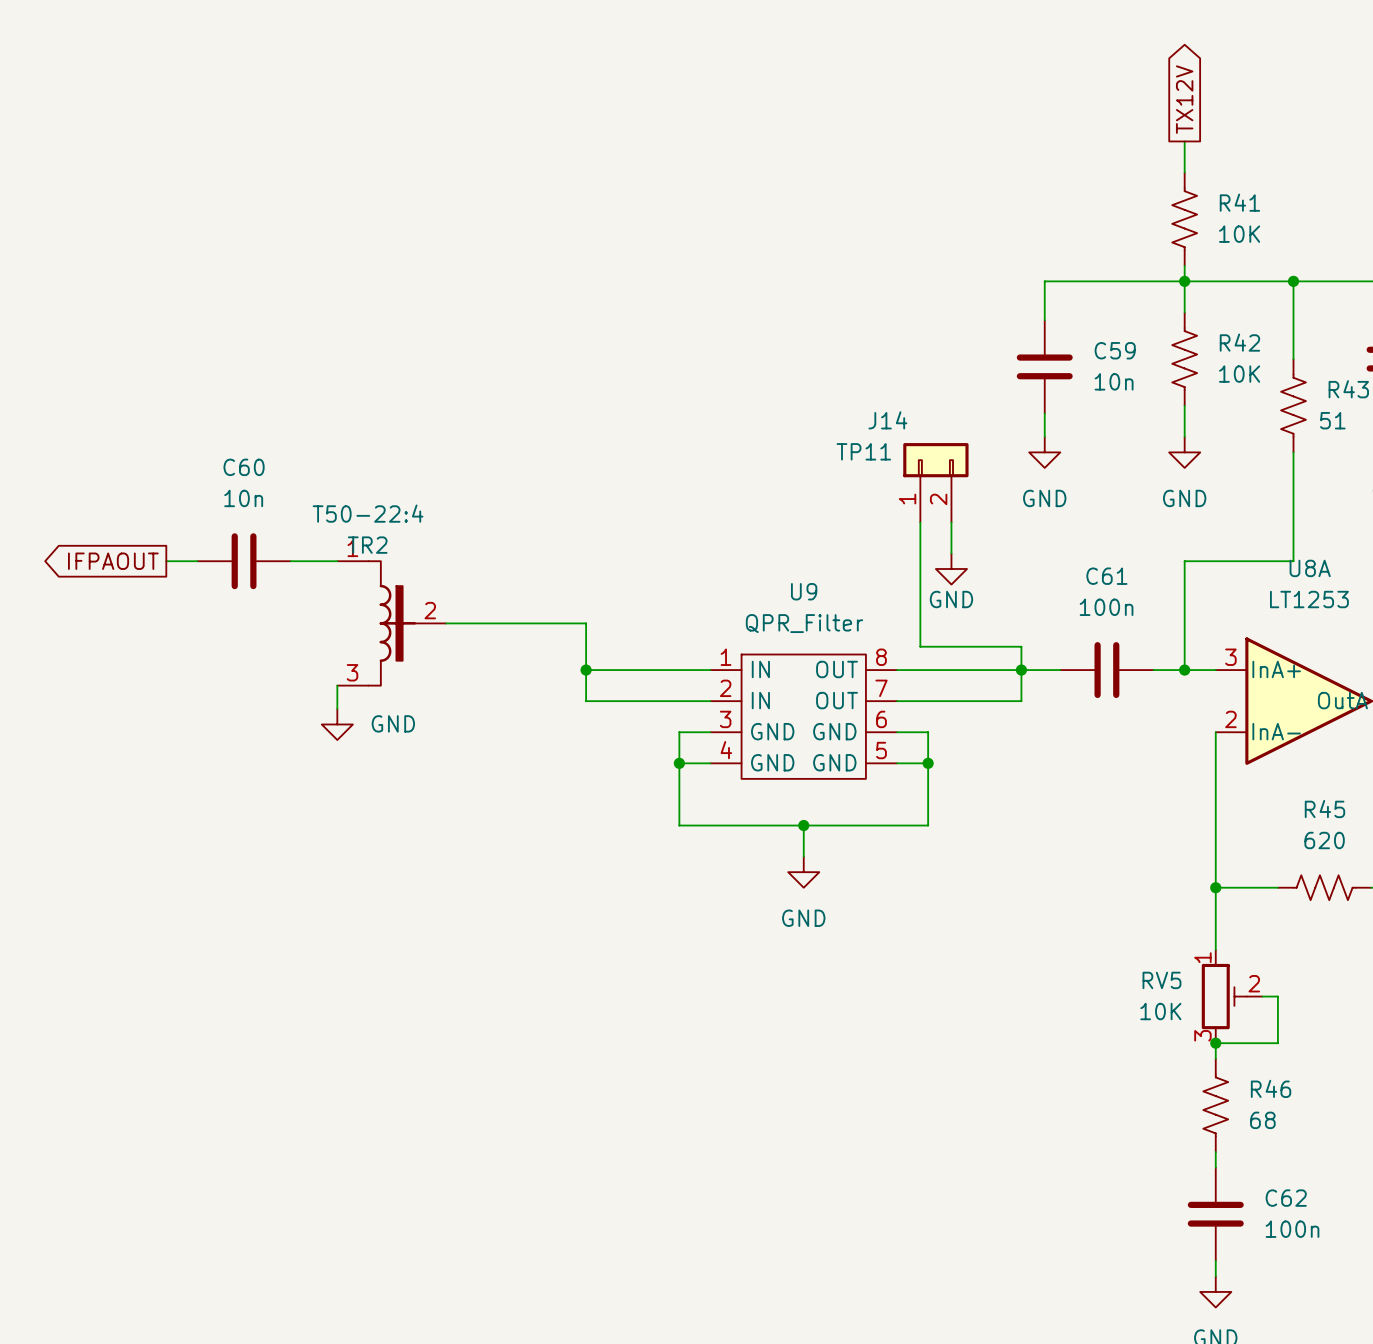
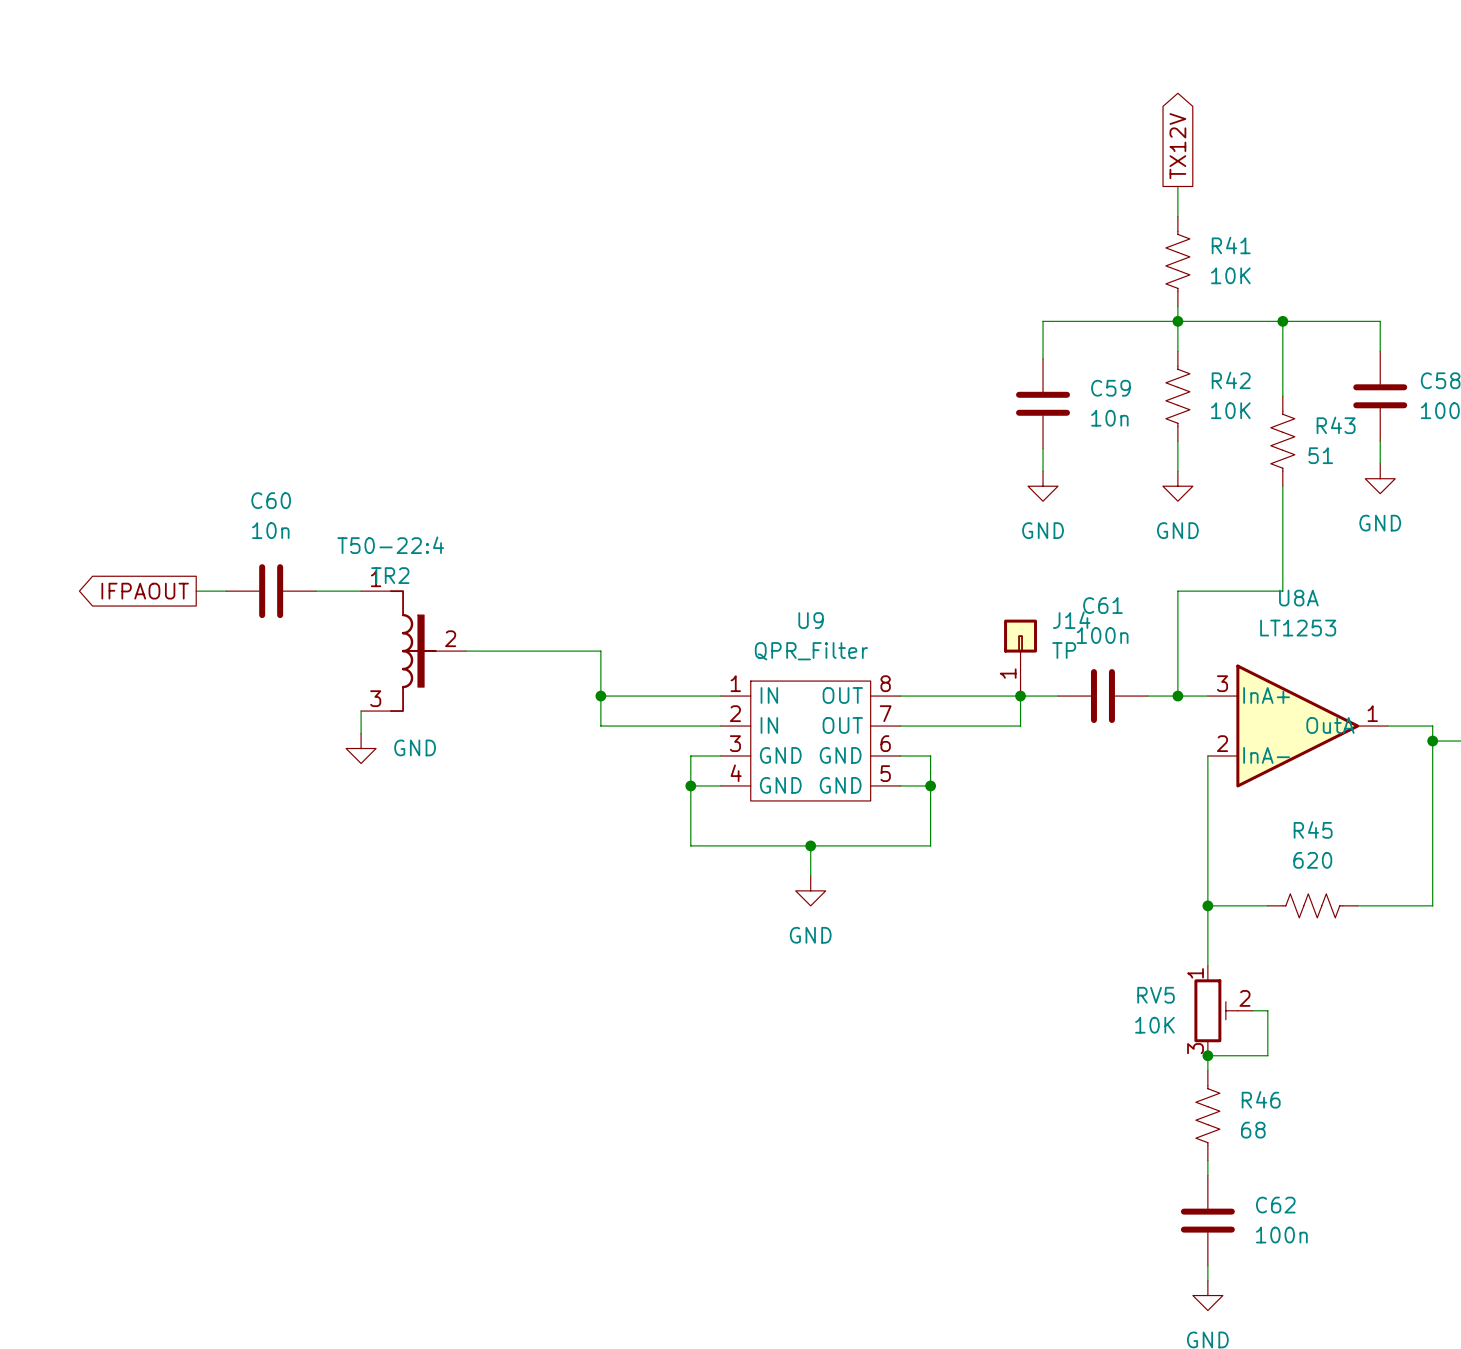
J14 name position: J14 (887, 420) -> J14 (1071, 620)
J14 symbol: [903, 443, 969, 523] -> [1004, 619, 1038, 697]
J14 value: TP11 (863, 451) -> TP (1064, 650)
wire: (920, 522) (920, 646) (1021, 646) (1021, 670) -> none
wire: (951, 522) (951, 553) -> none
power symbol: GND (951, 569) -> none

